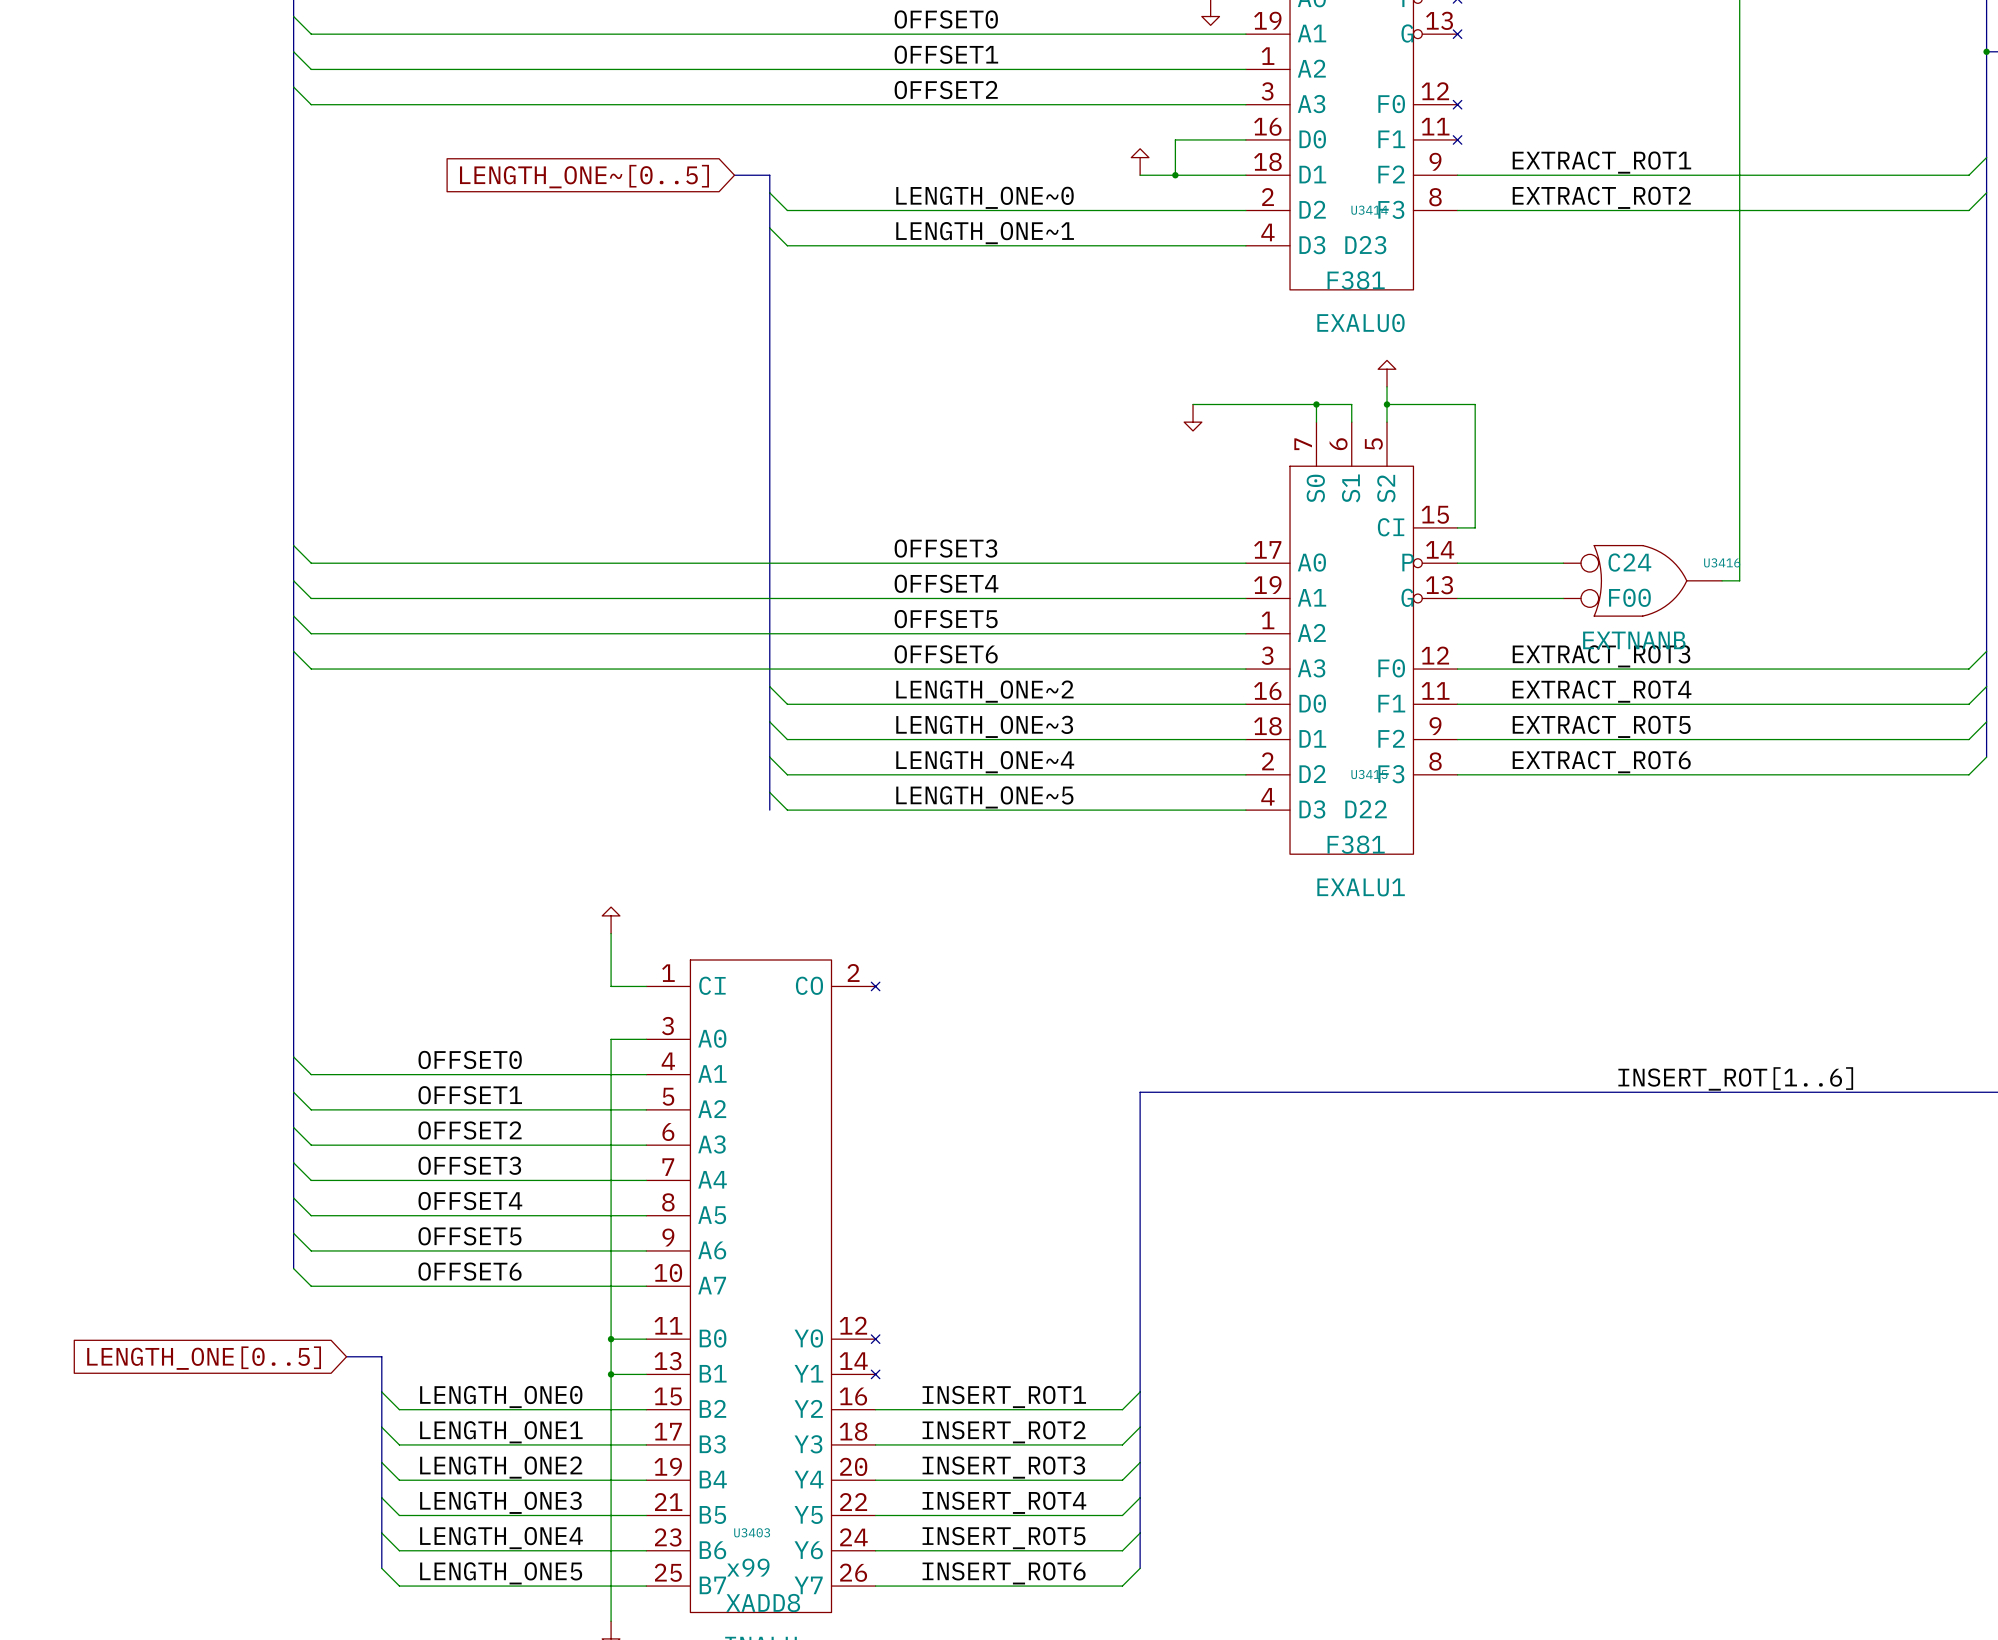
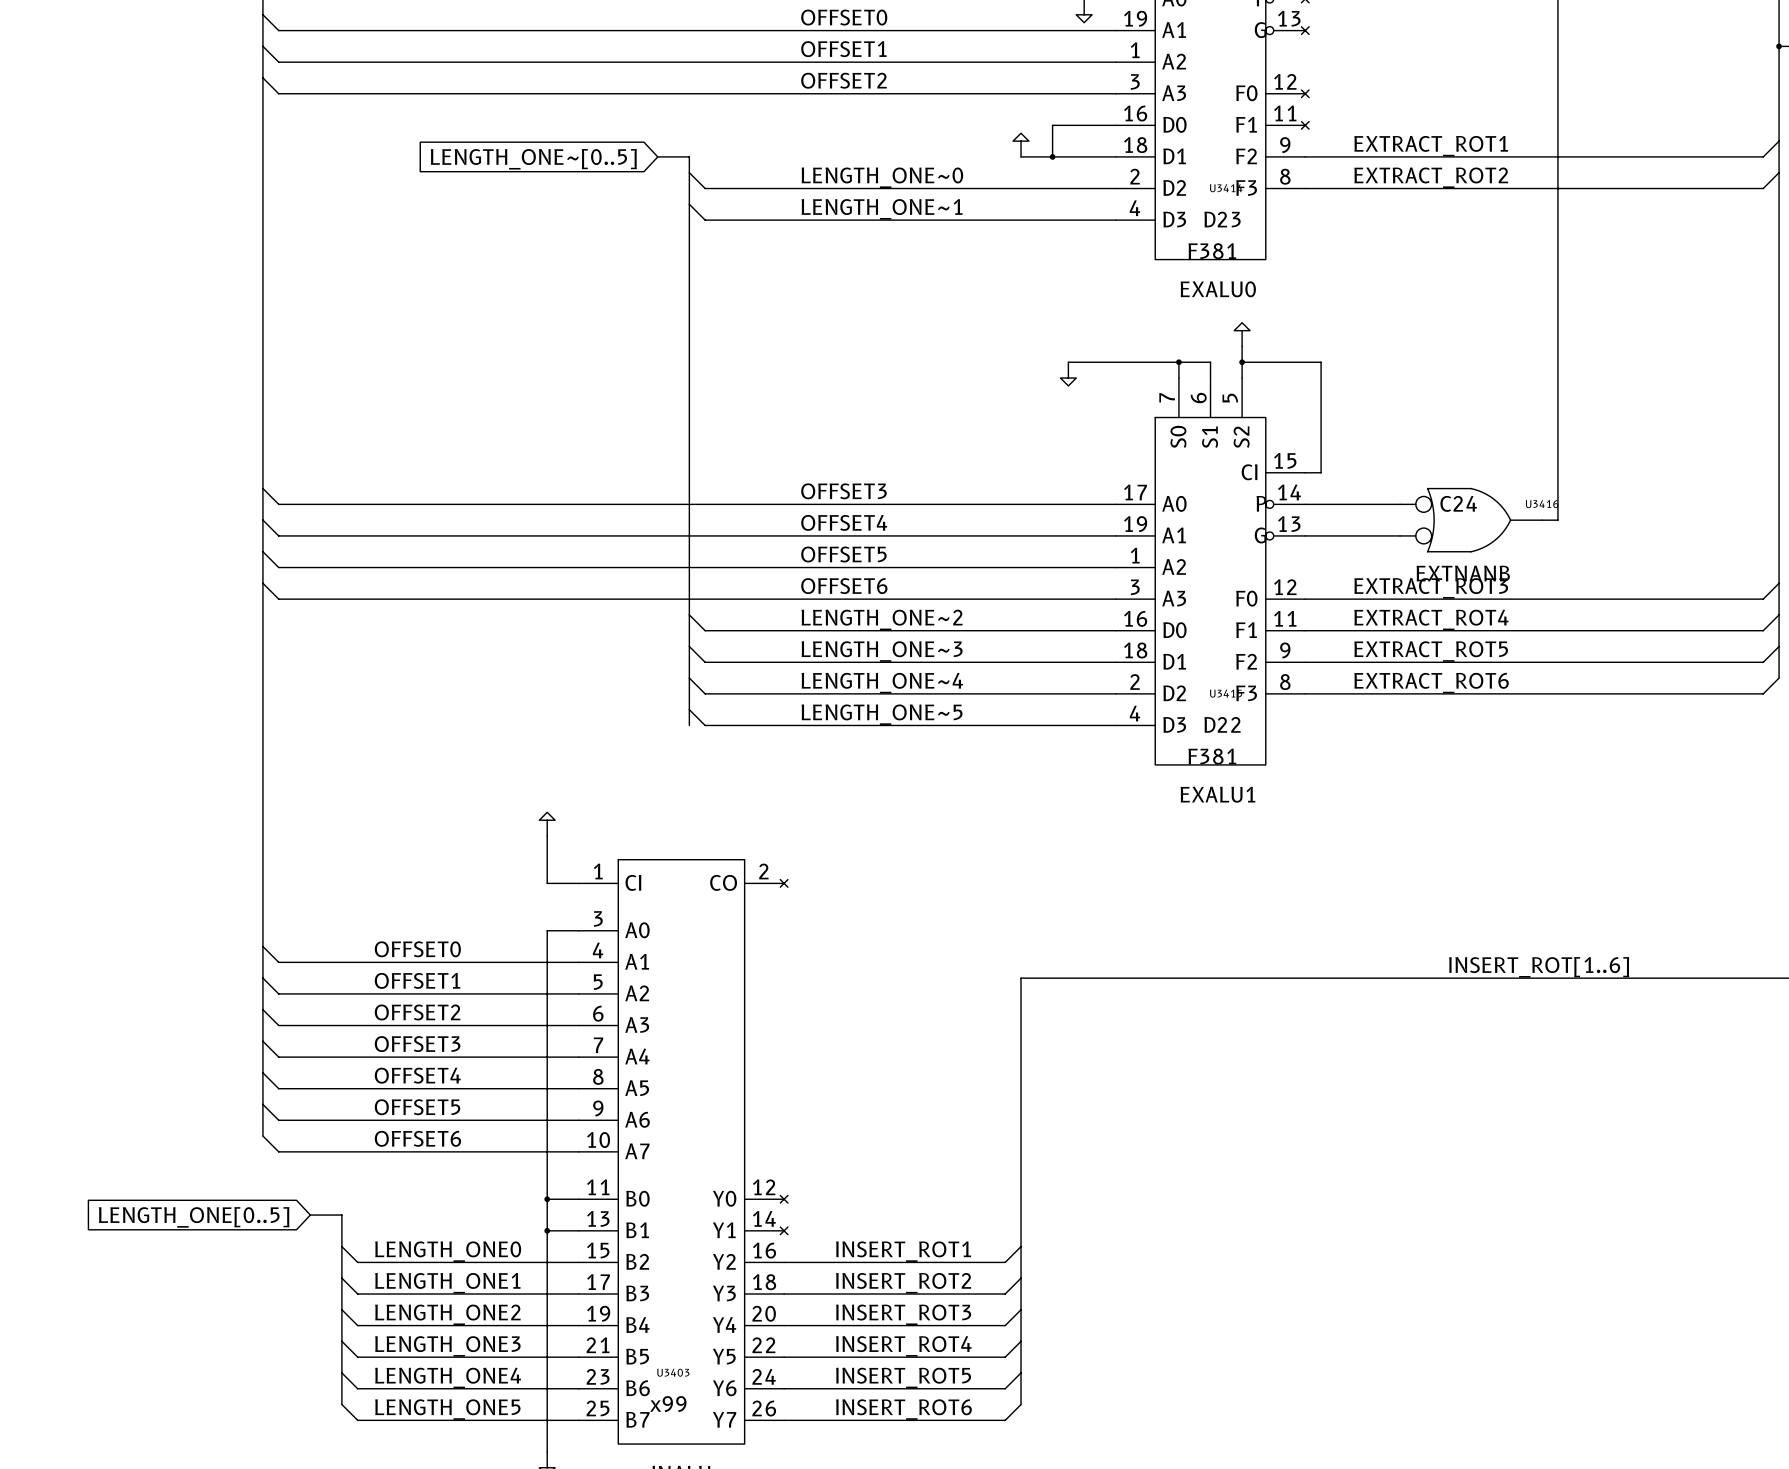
U3416 value: F00 (1629, 597) -> none
U3403 value: XADD8 (763, 1603) -> none

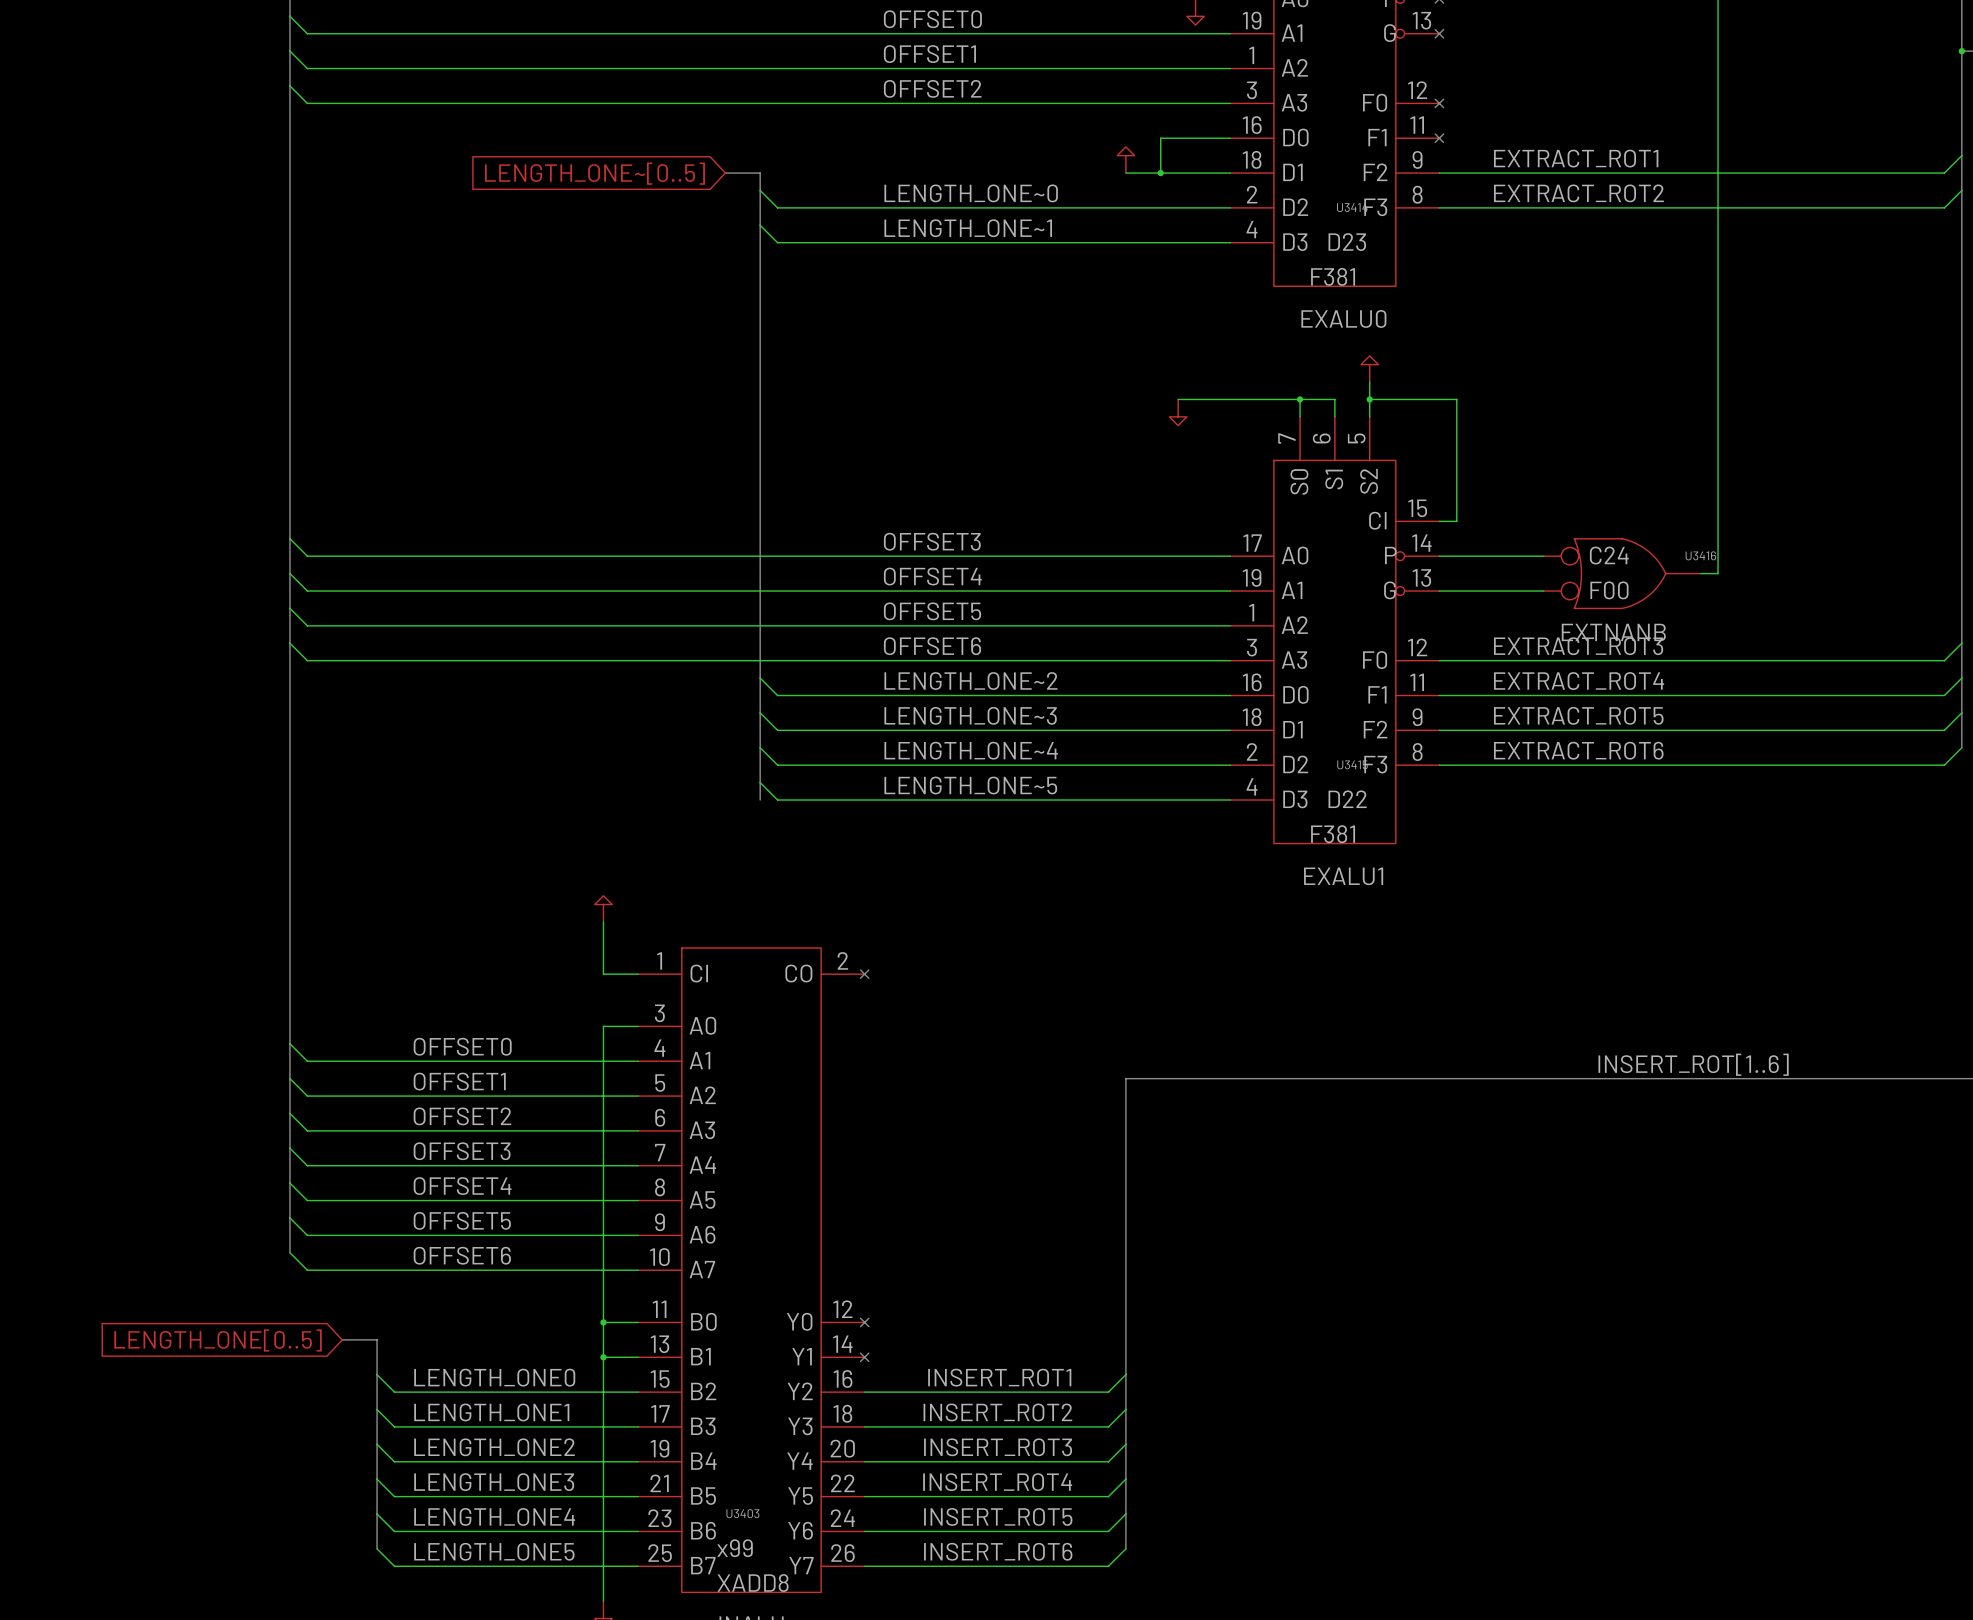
U3416 value: none -> F00 (1609, 590)
U3403 value: none -> XADD8 (753, 1583)

